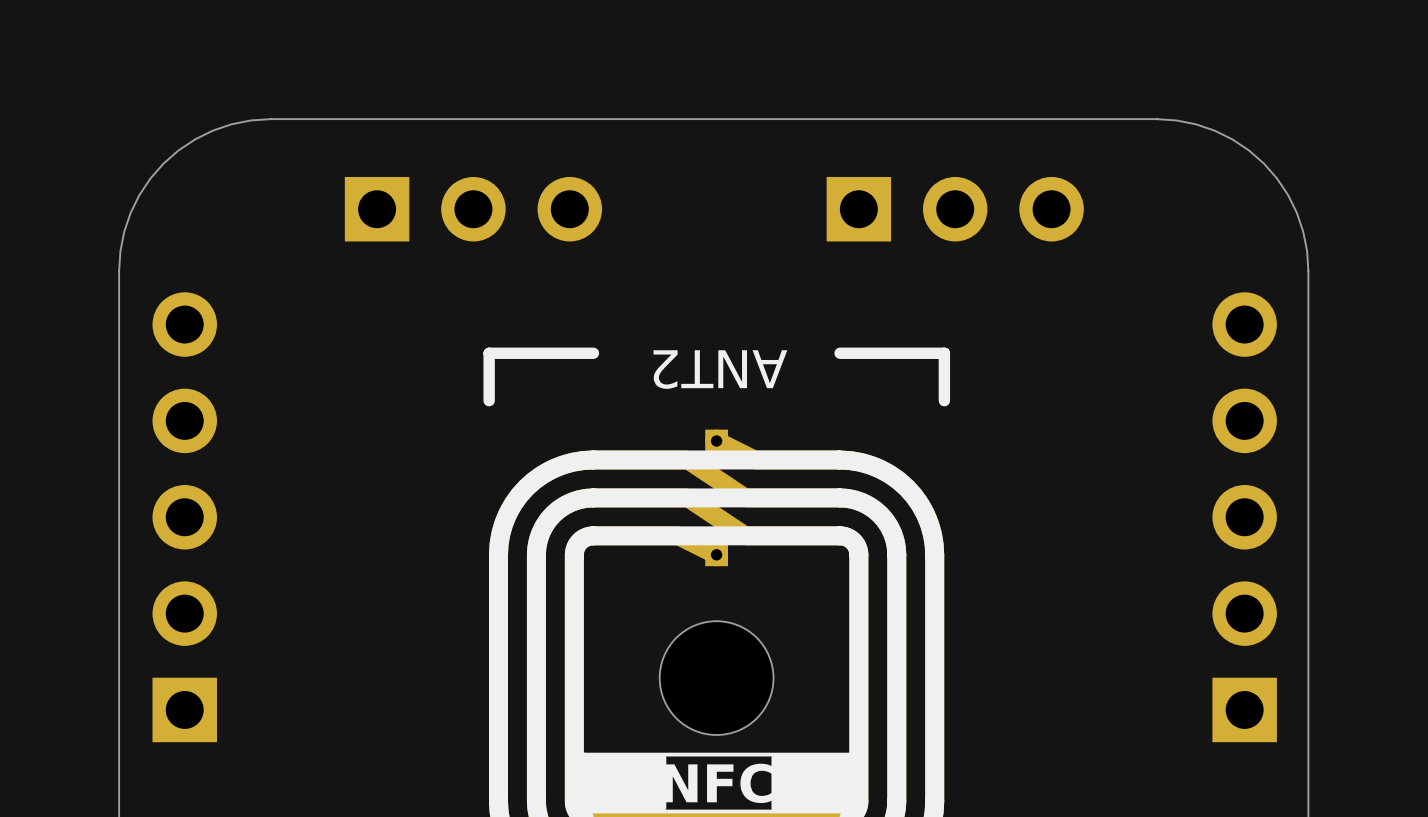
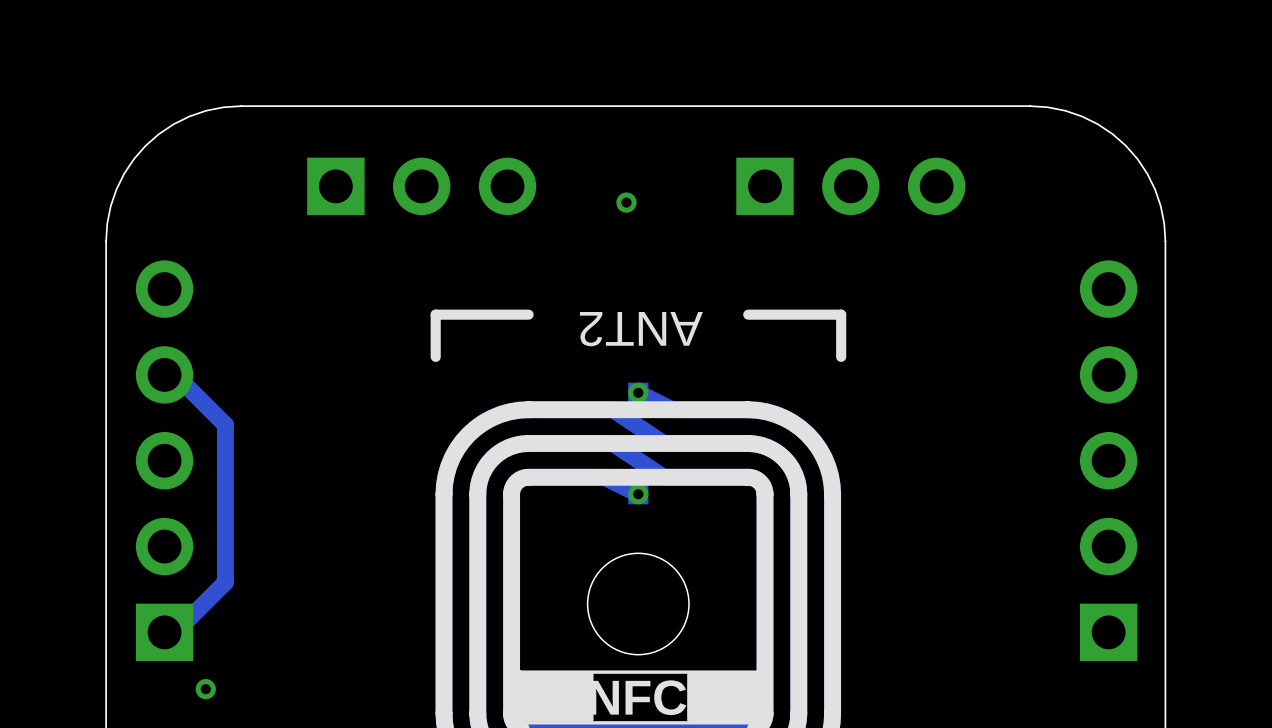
via: none -> (626, 202)
track: none -> (175, 374) (225, 424) (225, 582) (175, 632) (164, 632)
via: none -> (205, 689)

